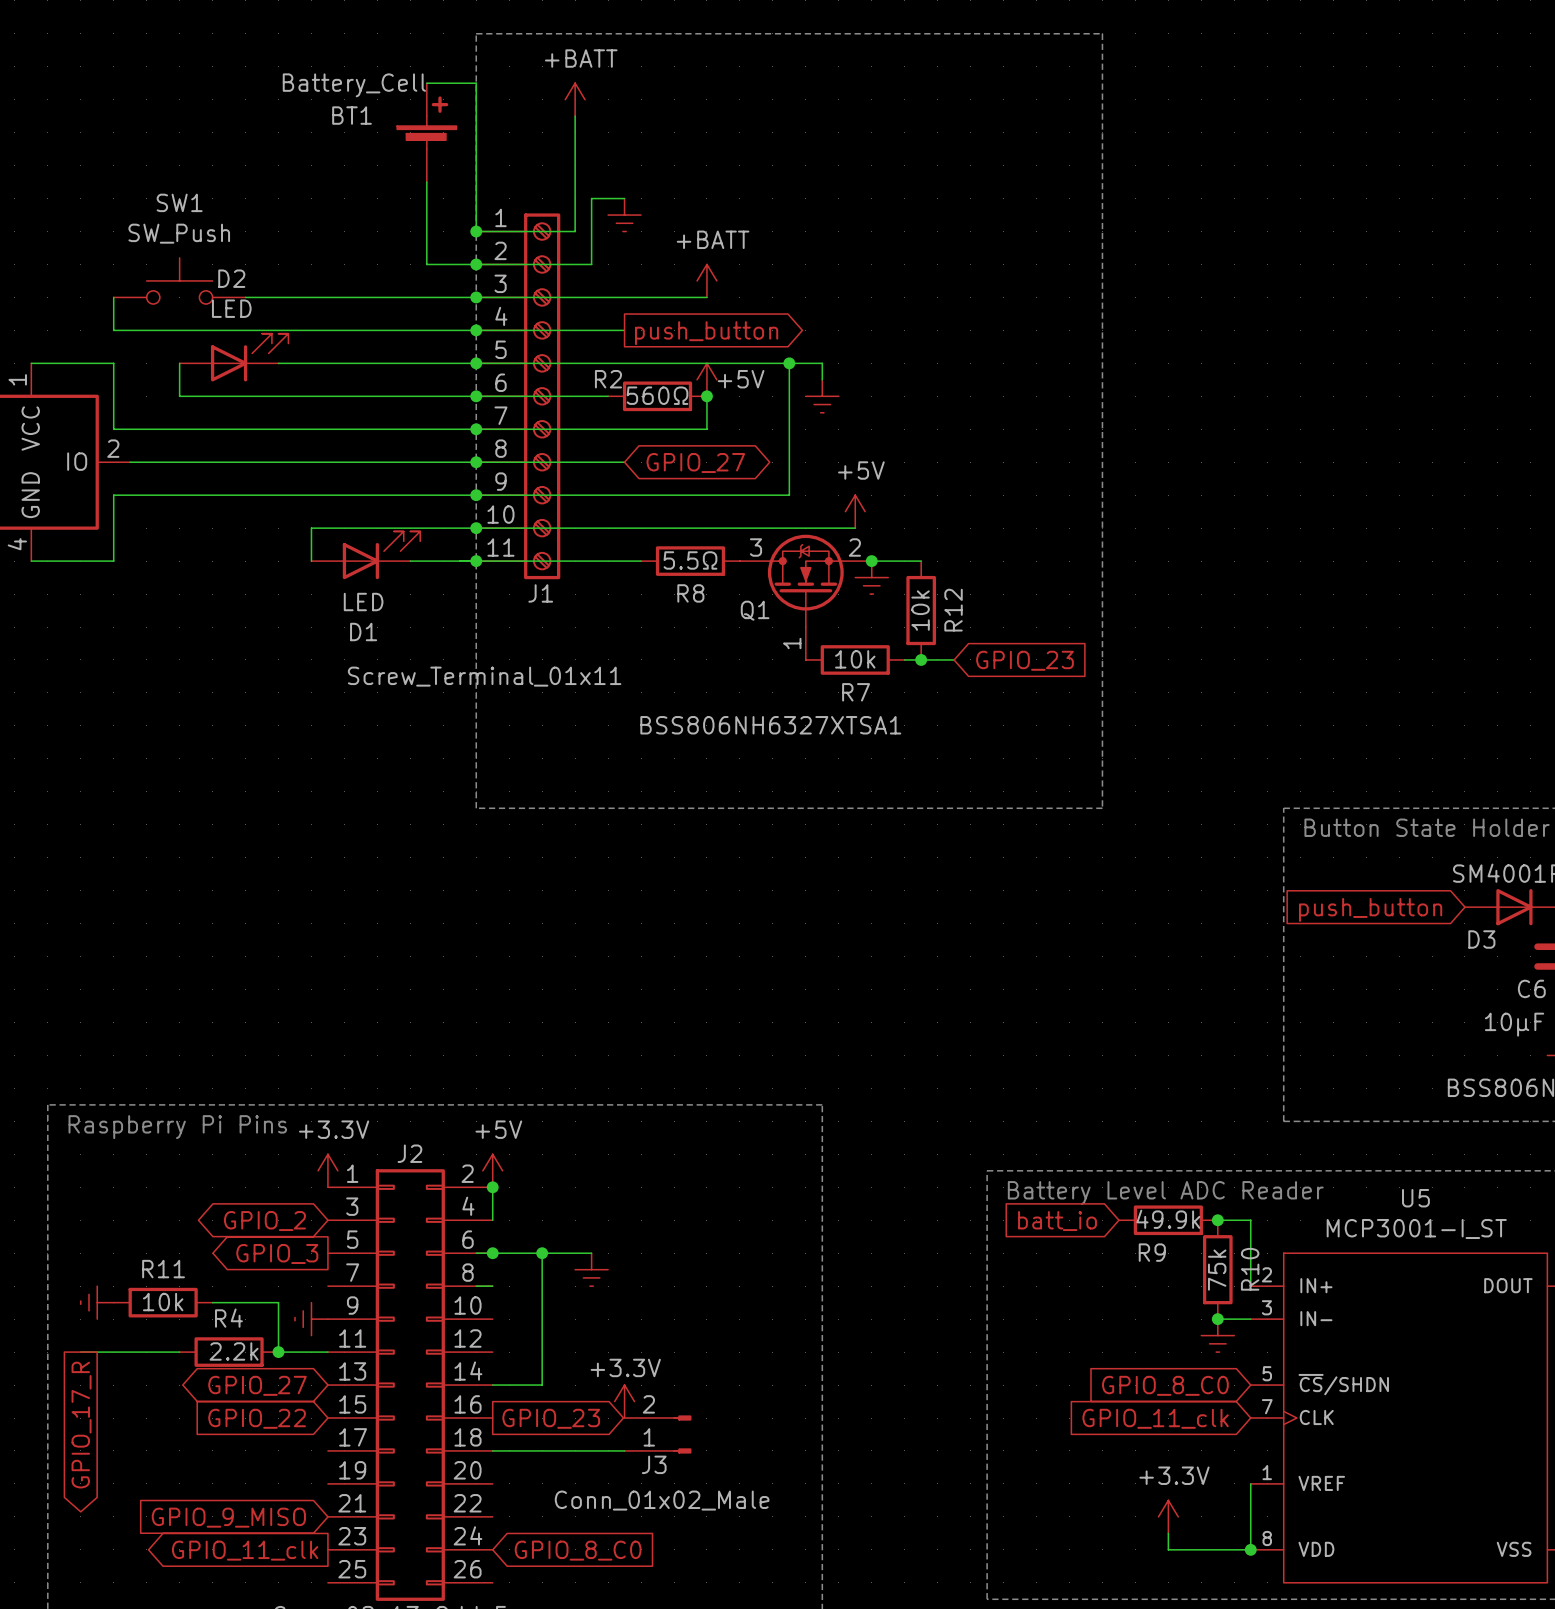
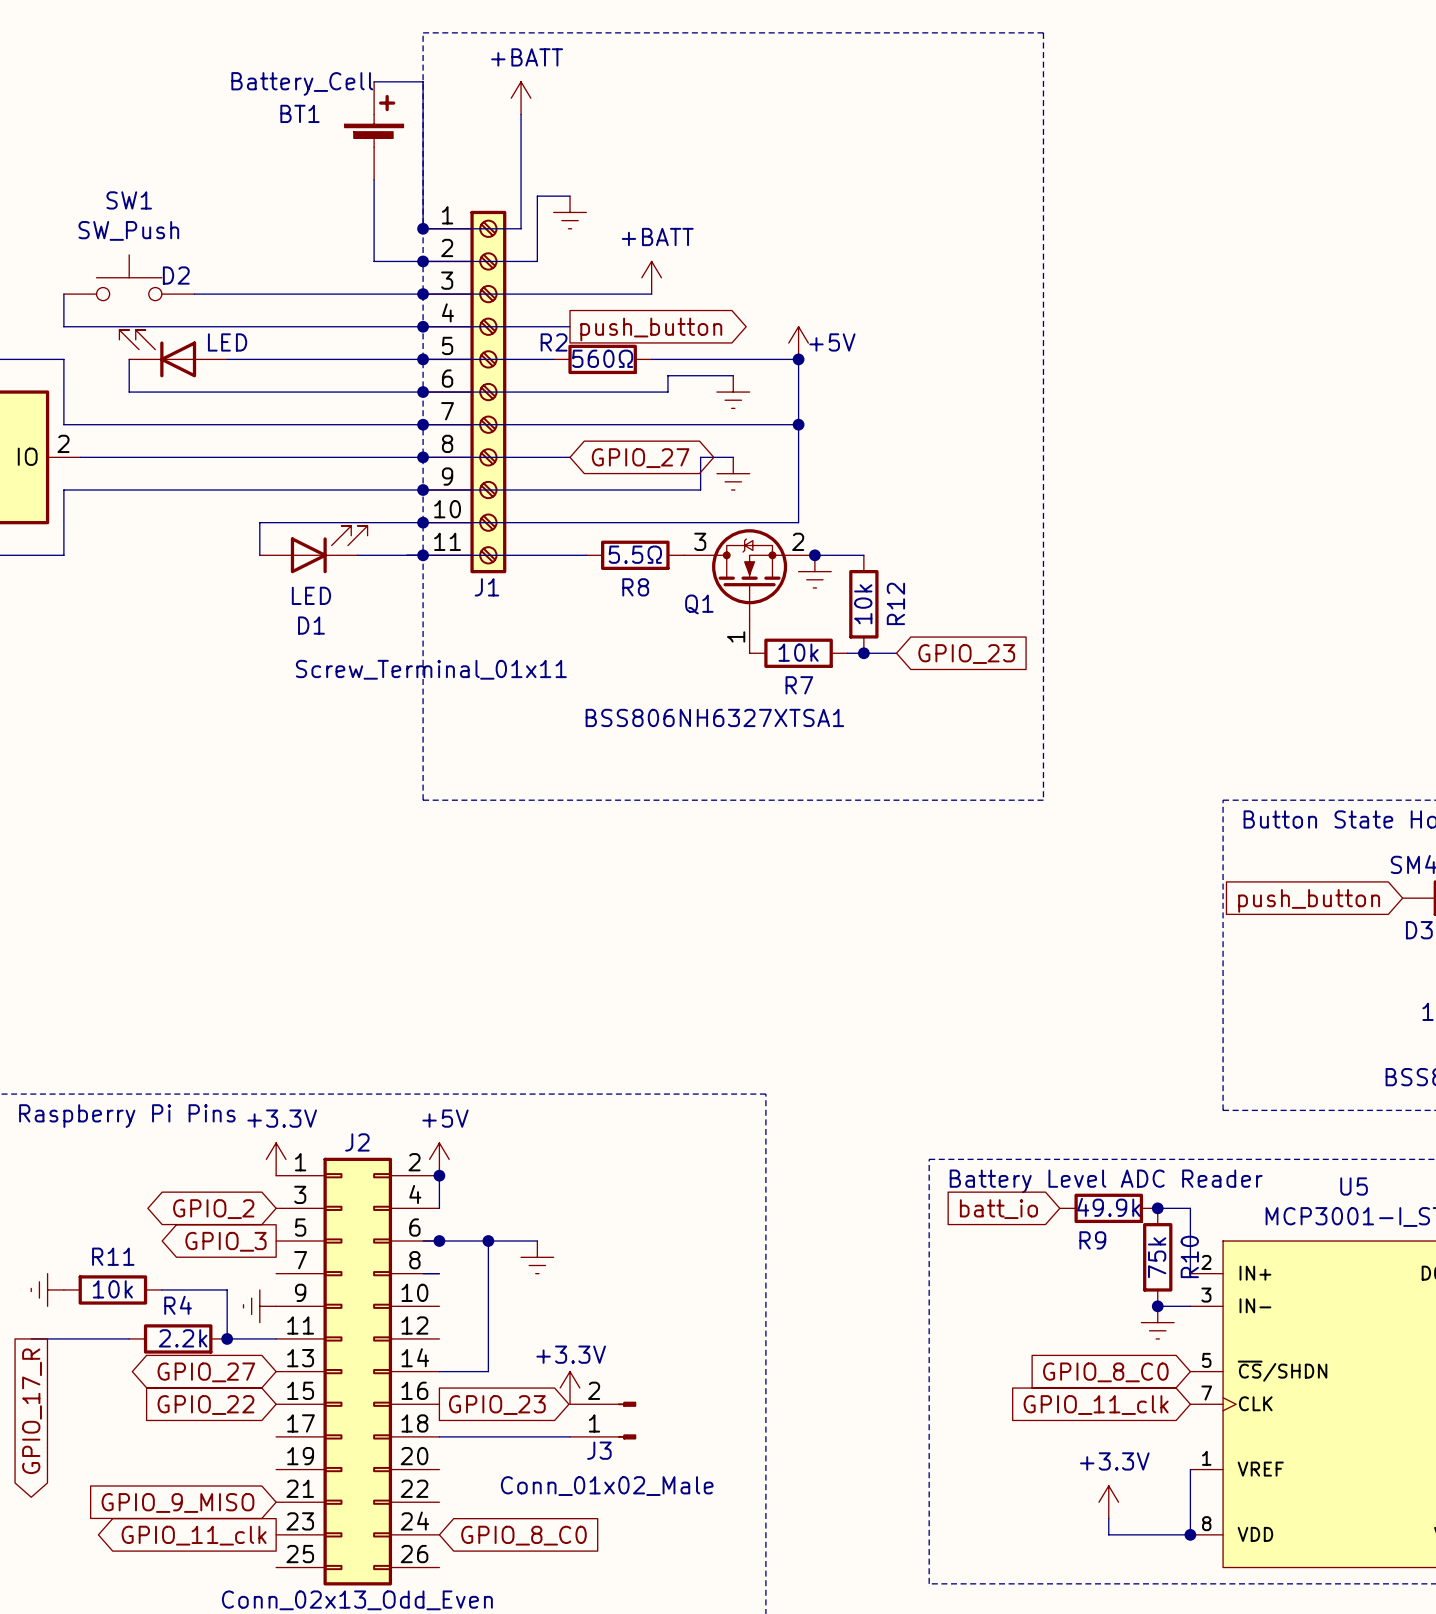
D2 value position: LED (231, 308) -> LED (227, 342)
power symbol: none -> +5V (798, 343)
D2 flip: as is (249, 357) -> left-right (157, 353)
wire: (789, 363) (789, 495) (756, 495) -> (733, 457) (700, 457) (700, 490)
junction: (789, 363) -> none
wire: (822, 363) (822, 379) -> (765, 359) (798, 359) (798, 522)
junction: none -> (798, 359)
power symbol: +5V (706, 379) -> none
wire: none -> (733, 375) (667, 375) (667, 392) (553, 392)
R2 position: (657, 396) -> (602, 359)
wire: (706, 396) (706, 429) -> (798, 424) (651, 424)
junction: (706, 396) -> none
power symbol position: (822, 396) -> (733, 392)
junction: none -> (798, 424)
power symbol: none -> (733, 473)
power symbol: +5V (855, 511) -> none

